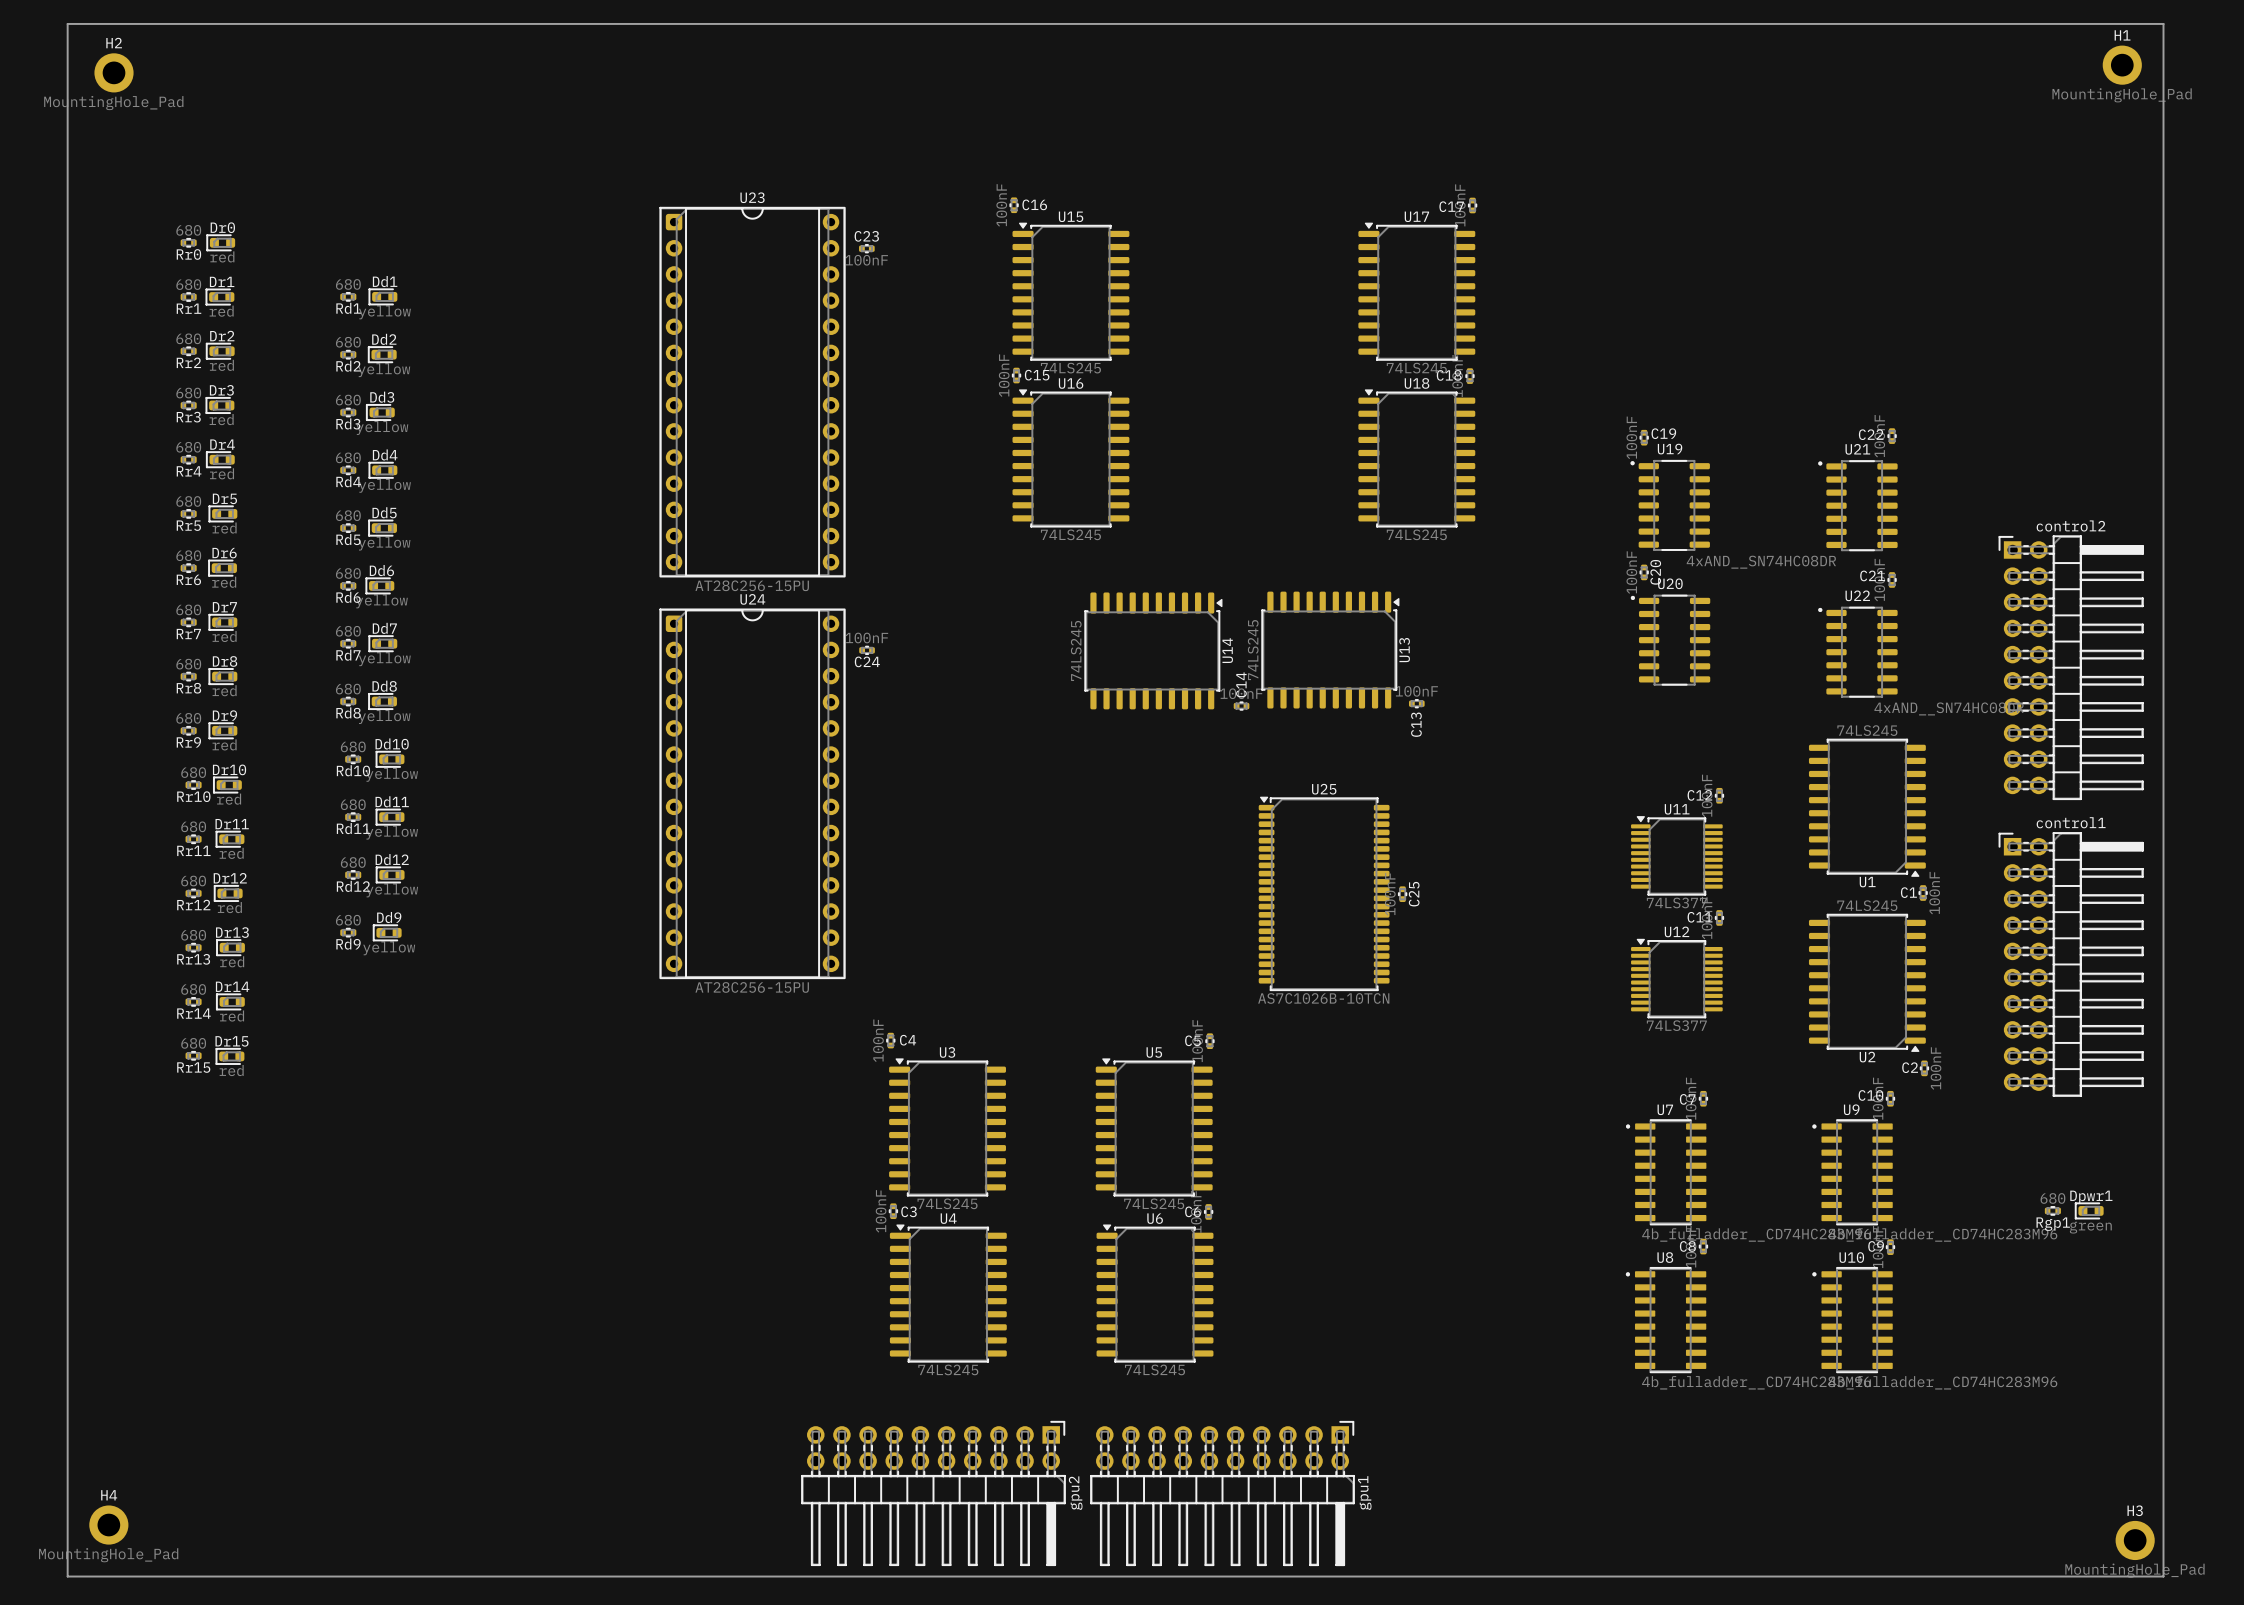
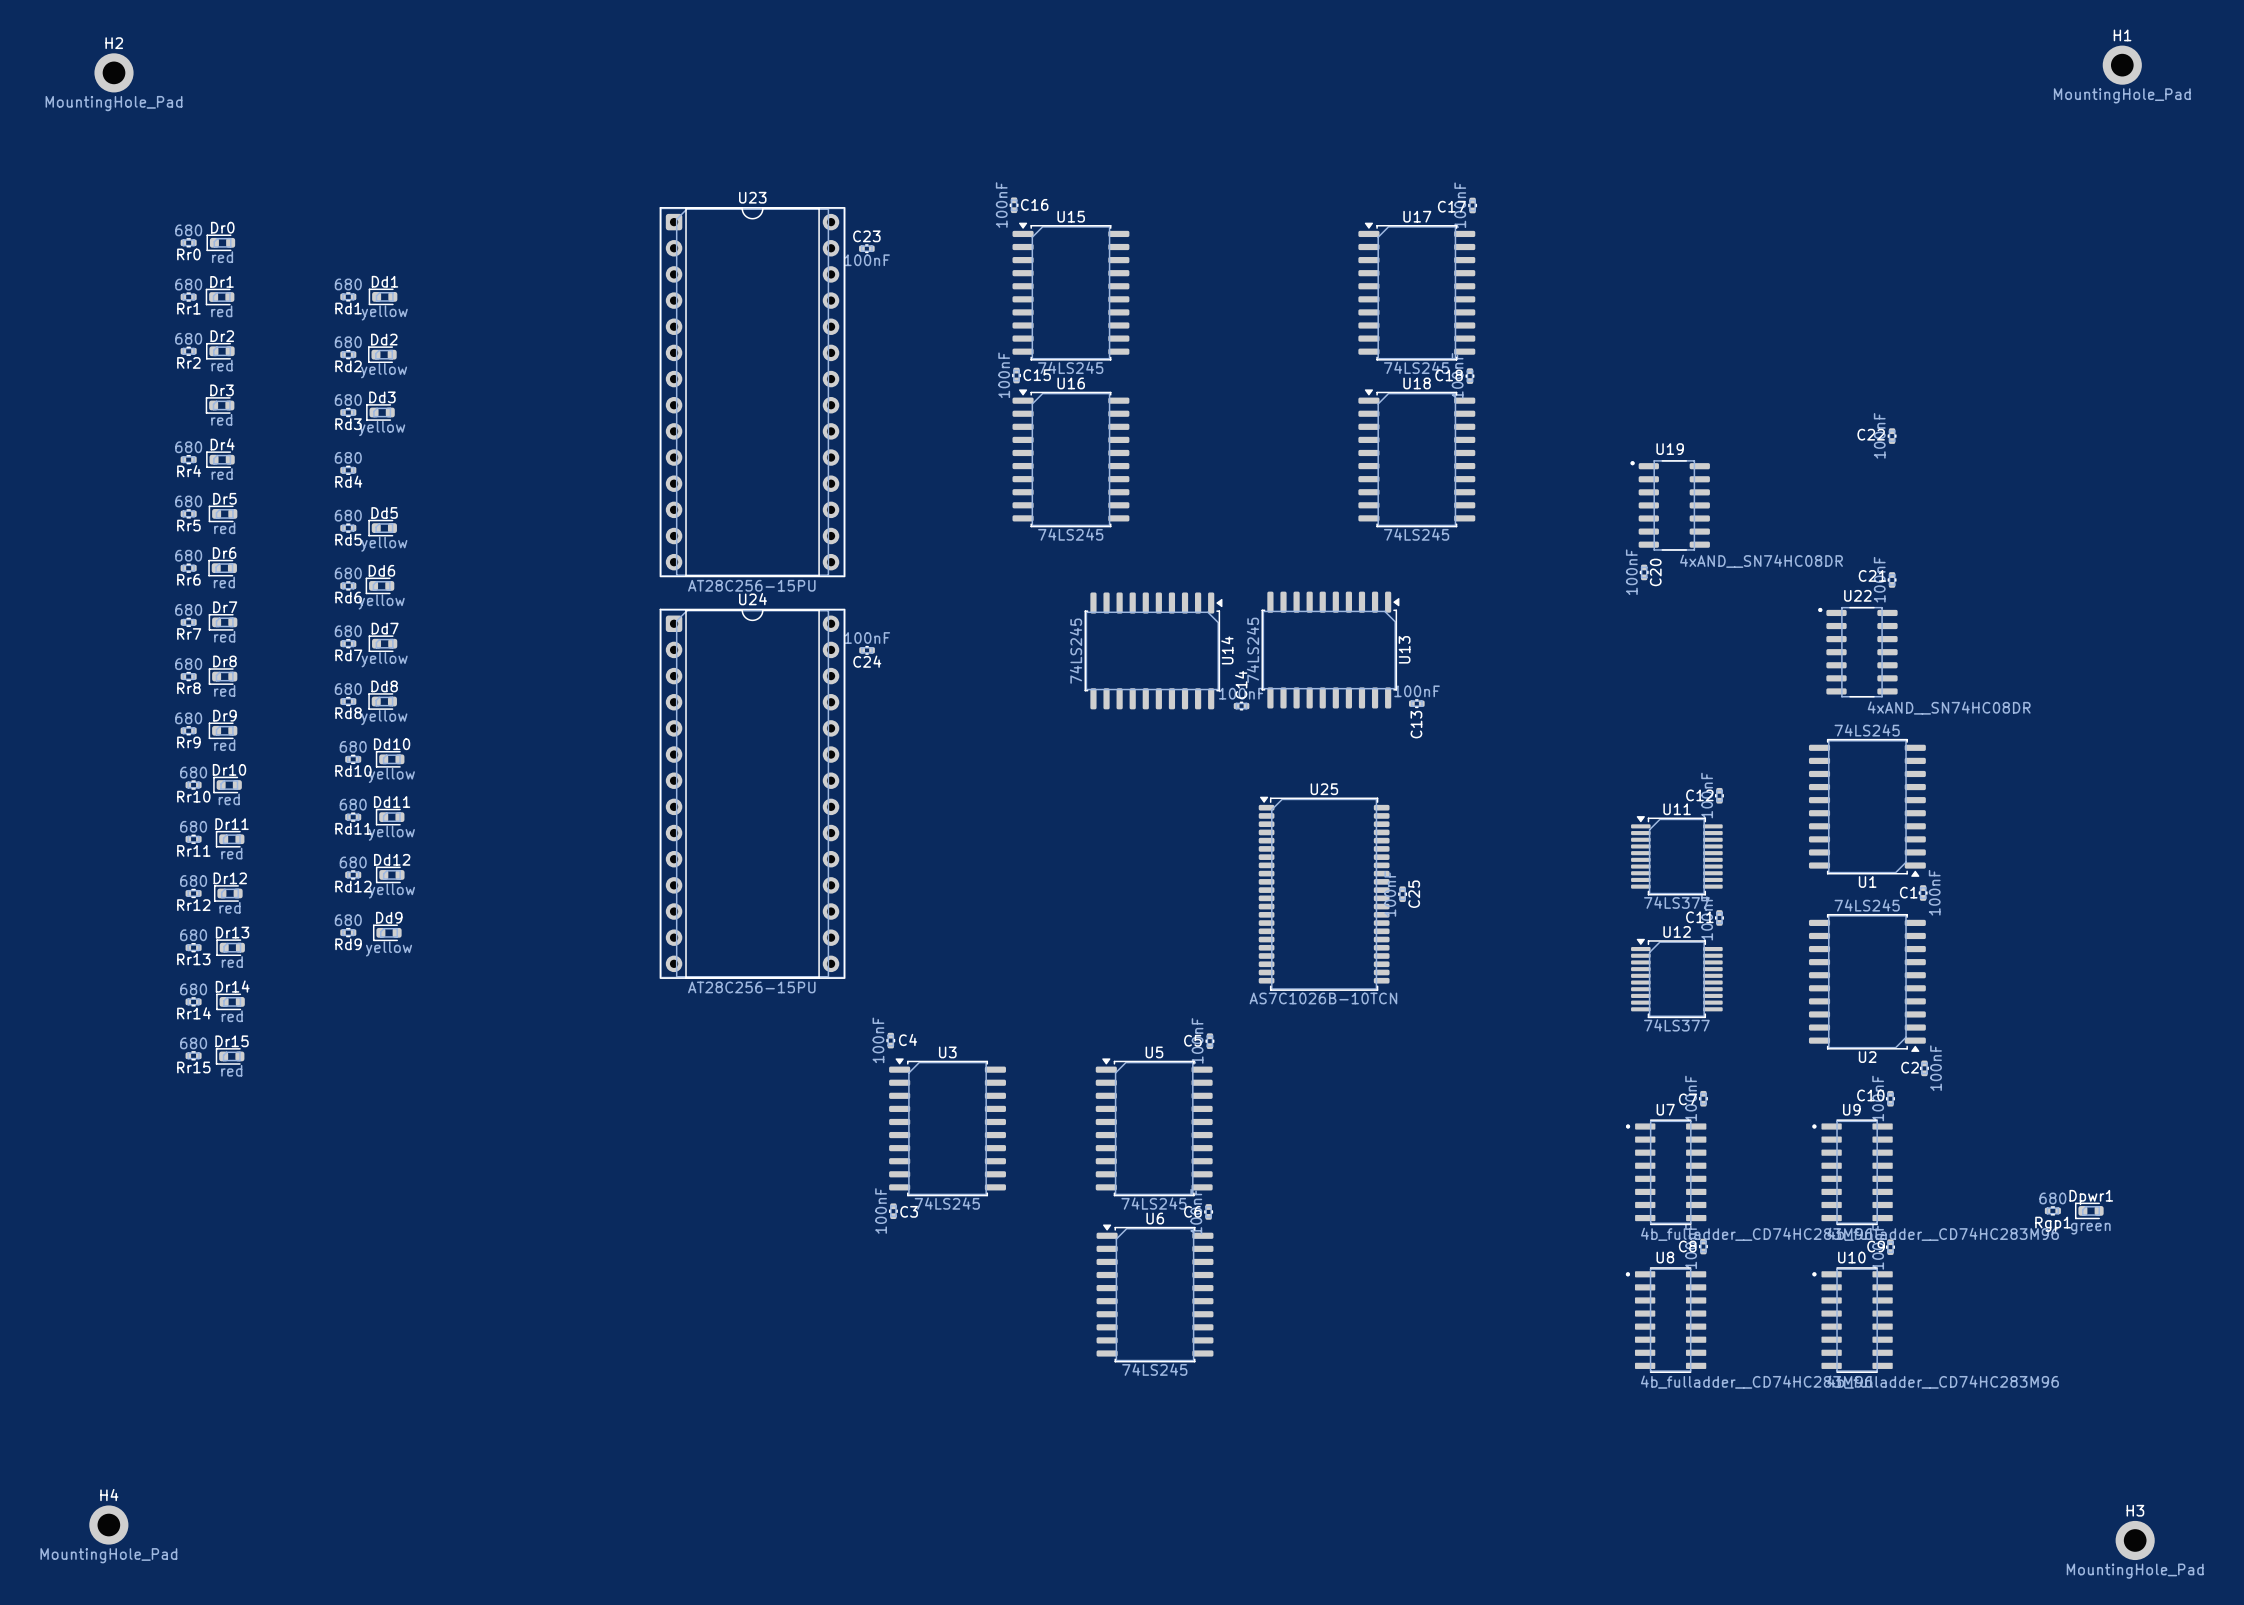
board edge: (67, 23) (2163, 23) (2163, 1576) (67, 1576) (67, 23) -> none
Rr3: 680 (188, 405) -> none
C19: 100nF (1644, 437) -> none
Dd4: yellow (383, 470) -> none
U21: (1857, 505) -> none
U20: (1670, 640) -> none
control2: (2071, 667) -> none
control1: (2071, 964) -> none
U4: 74LS245 (948, 1293) -> none
gpu2: (933, 1493) -> none
gpu1: (1222, 1493) -> none

